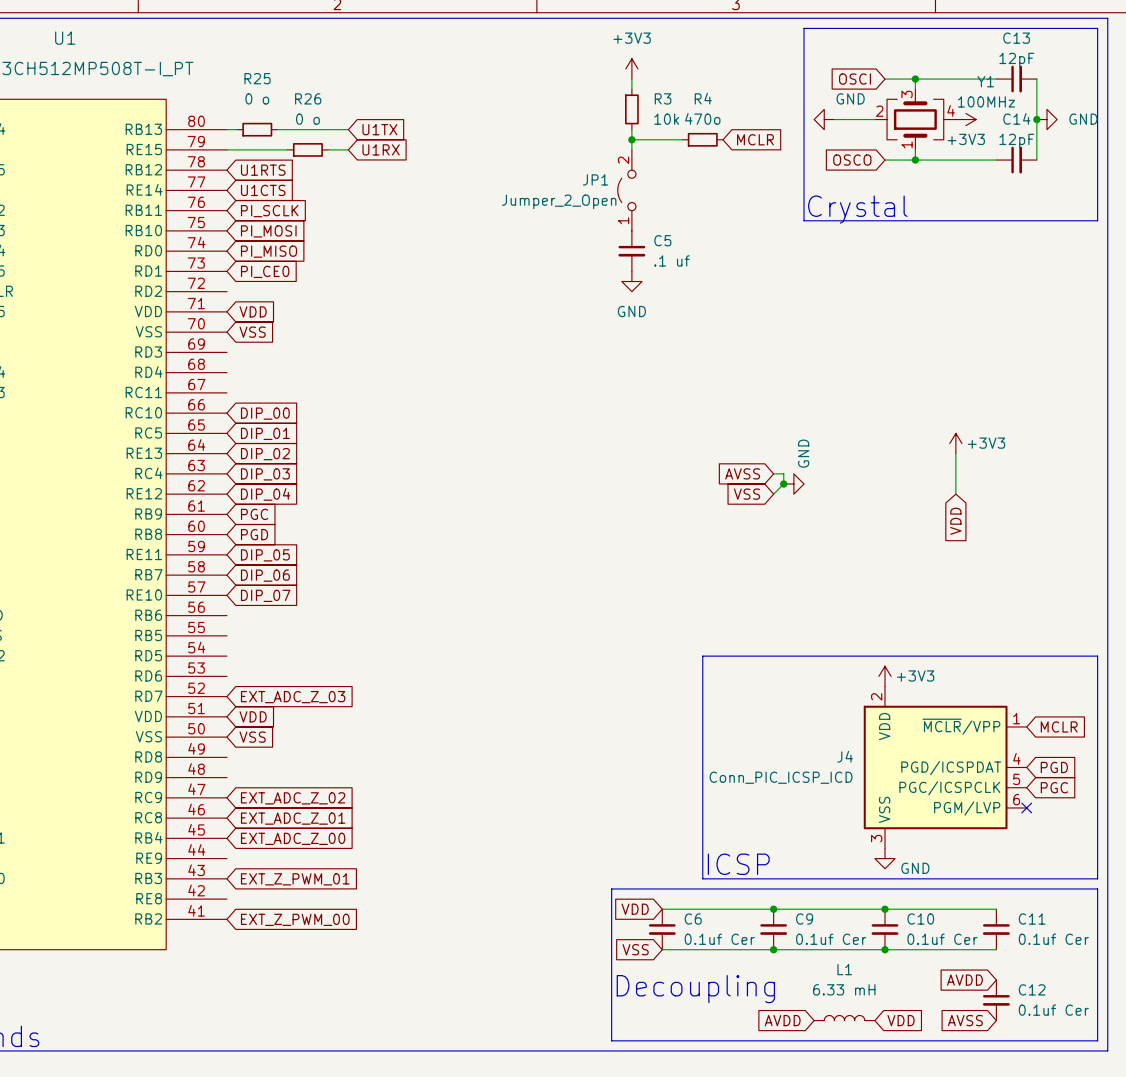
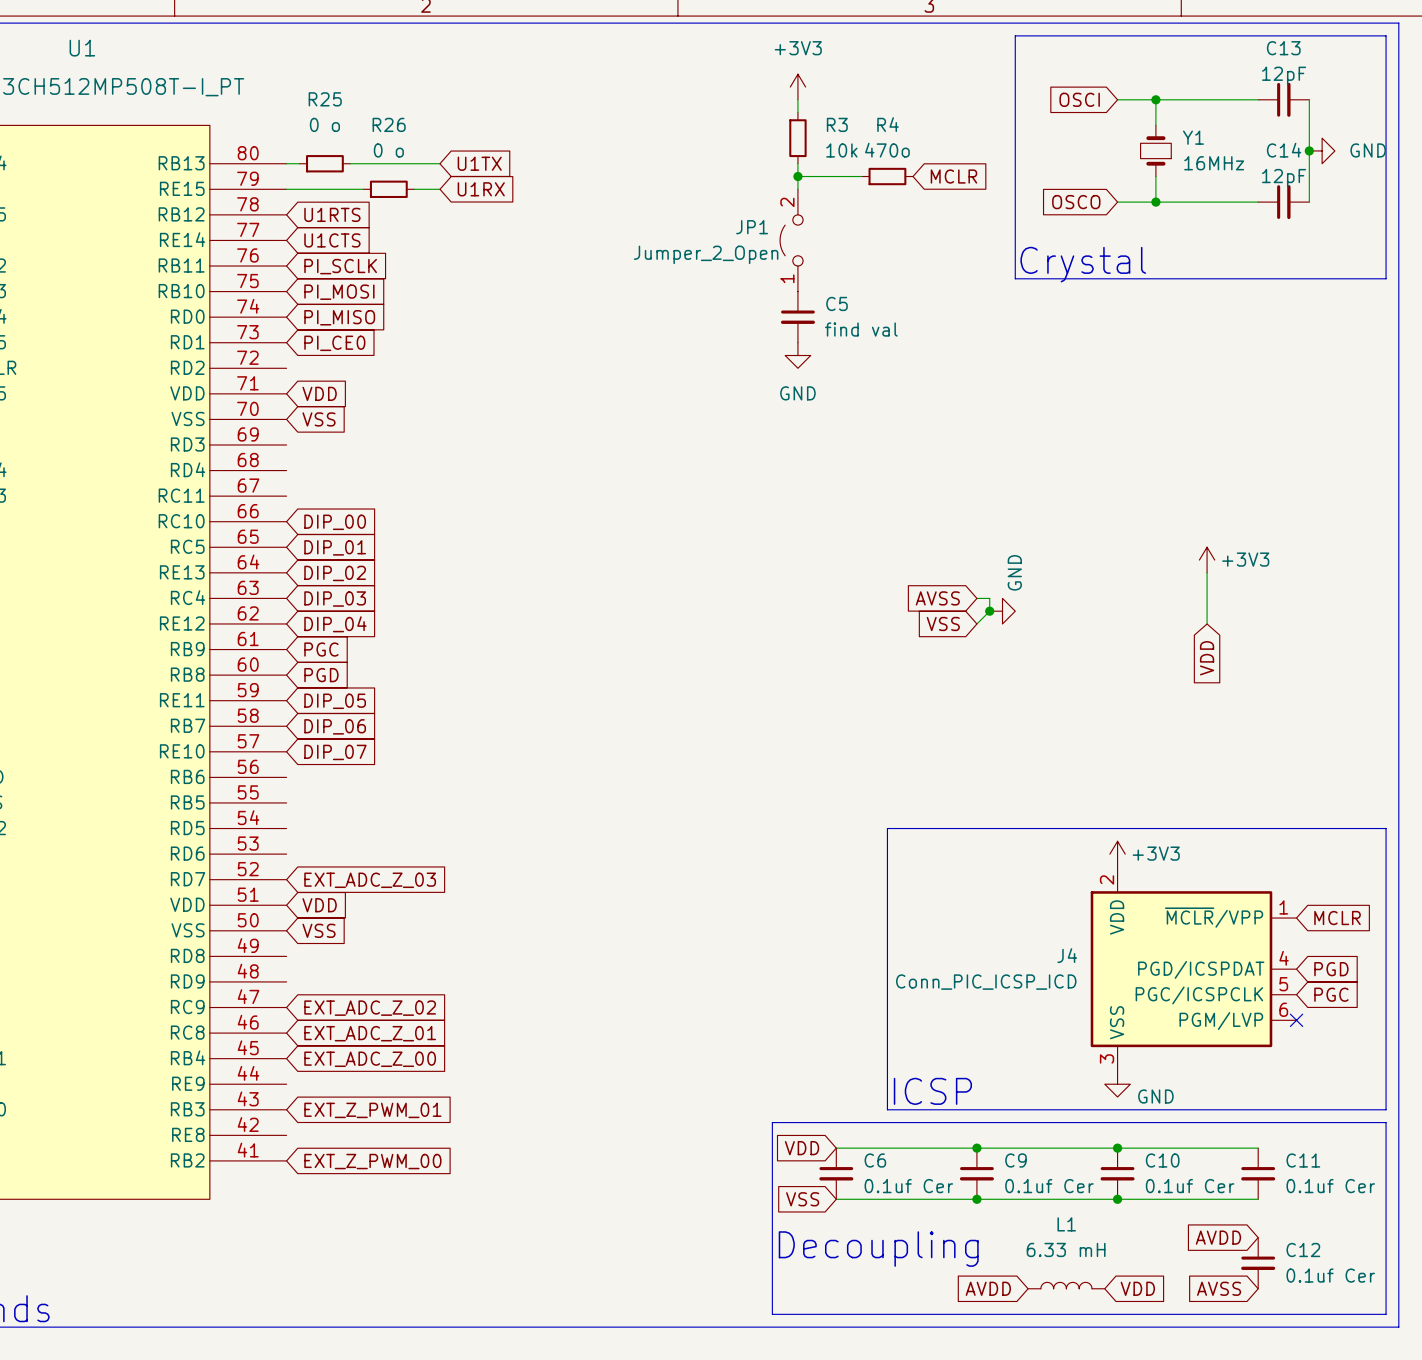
Y1 name position: Y1 (985, 81) -> Y1 (1193, 137)
Y1 symbol: [874, 89, 956, 150] -> [1140, 125, 1172, 177]
Y1 value: 100MHz (986, 101) -> 16MHz (1214, 163)
power symbol: GND (824, 119) -> none
wire: (834, 119) (874, 119) -> none
power symbol: +3V3 (966, 119) -> none
C5 value: .1 uf (671, 260) -> find val (861, 329)

